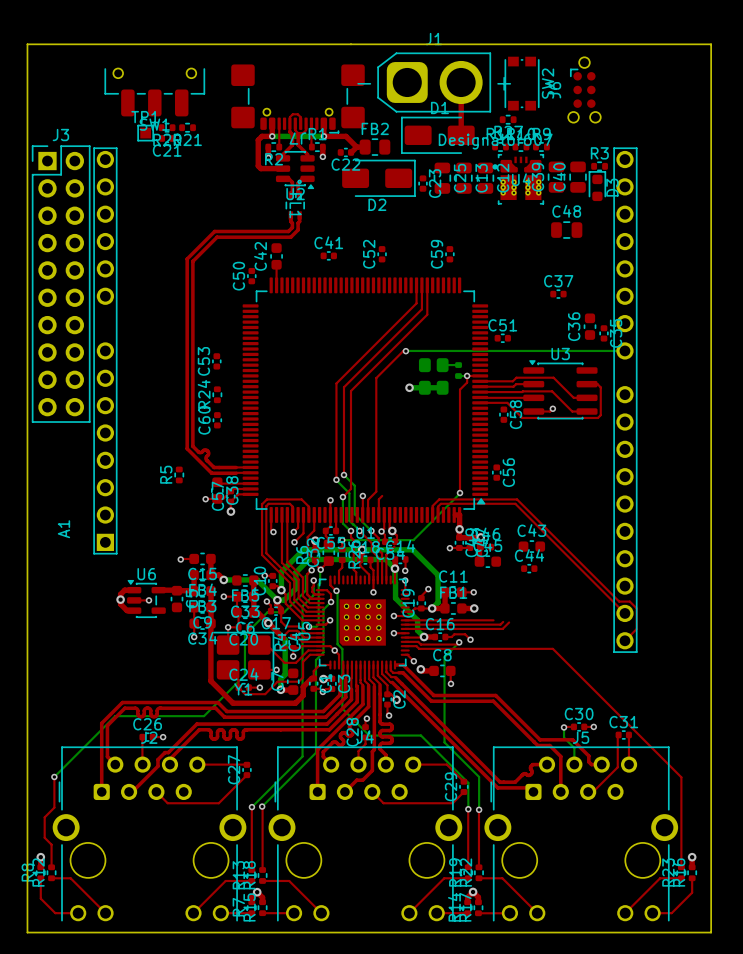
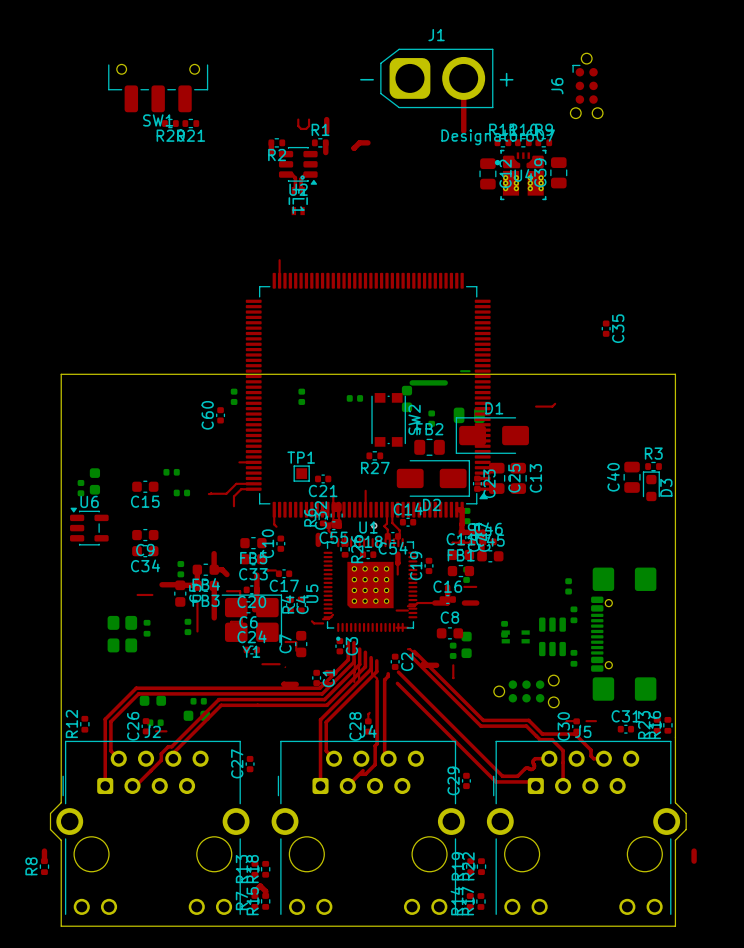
SW2 position: (522, 83) -> (388, 419)
J7: (298, 98) -> none
R27 position: (508, 119) -> (374, 455)
top track: (272, 123) (272, 136) (262, 136) (258, 140) (258, 165) (260, 168) (283, 168) -> none
top track: (279, 123) (279, 147) -> none
top track: (300, 123) (300, 117) (297, 114) (292, 114) (289, 117) (289, 131) -> none
top track: (311, 123) (311, 147) -> none
top track: (289, 131) (292, 134) (292, 145) (283, 154) (283, 158) -> none
TP1 position: (145, 133) -> (301, 473)
top track: (298, 133) (298, 145) (307, 154) (307, 158) -> none
D1 position: (437, 135) -> (492, 435)
bottom track: (272, 136) (323, 136) -> none
via: (272, 136) -> none
top track: (323, 136) (346, 136) (356, 147) -> none
via: (323, 136) -> none
C21 position: (167, 138) -> (323, 478)
FB2 position: (374, 147) -> (429, 447)
C22: (345, 152) -> none
via: (322, 156) -> none
via: (268, 157) -> none
R3 position: (599, 166) -> (653, 466)
C40 position: (578, 177) -> (632, 477)
D2 position: (378, 178) -> (433, 478)
C25 position: (442, 178) -> (496, 478)
C13 position: (463, 178) -> (518, 478)
C23 position: (422, 183) -> (477, 483)
D3 position: (597, 186) -> (651, 486)
top track: (290, 215) (292, 227) (288, 231) (214, 231) (187, 259) (187, 448) (211, 473) (250, 472) -> none
top track: (299, 215) (298, 229) (290, 237) (217, 237) (192, 261) (192, 446) (199, 452) (207, 450) (208, 453) (206, 459) (214, 467) (236, 467) -> none
C48 side: top (566, 230) -> bottom (469, 415)
C52 side: top (382, 254) -> bottom (301, 396)
C59 side: top (449, 254) -> bottom (234, 396)
C41 side: top (328, 255) -> bottom (354, 398)
C42 side: top (276, 256) -> bottom (406, 398)
C50 side: top (251, 276) -> bottom (431, 418)
J3: (61, 284) -> none
top track: (416, 285) (416, 303) (336, 383) (336, 479) -> none
top track: (421, 285) (421, 309) (343, 387) (343, 474) -> none
top track: (427, 285) (427, 314) (350, 391) (350, 488) (342, 497) -> none
C37: (558, 294) -> none
C36: (590, 326) -> none
C51: (502, 338) -> none
bottom track: (624, 350) (405, 351) -> none
top track: (405, 351) (403, 351) (376, 378) (376, 491) (368, 499) (368, 514) -> none
via: (405, 351) -> none
C53: (216, 361) -> none
bottom track: (442, 365) (458, 365) -> none
part: (458, 370) -> none
via: (467, 375) -> none
top track: (480, 375) (467, 375) (467, 382) (460, 389) (460, 493) -> none
part: (433, 376) -> none
top track: (480, 381) (512, 381) (516, 377) (553, 377) (573, 398) (587, 397) -> none
top track: (533, 384) (516, 384) (513, 386) (480, 386) -> none
top track: (587, 384) (597, 384) (600, 387) (600, 415) (597, 417) (522, 417) (507, 402) (480, 402) -> none
via: (409, 387) -> none
U3: (560, 389) -> none
top track: (480, 392) (552, 391) (572, 411) (587, 411) -> none
R24: (217, 394) -> none
top track: (480, 397) (533, 397) -> none
A1: (365, 400) -> none
via: (552, 408) -> none
C58: (503, 414) -> none
C56: (496, 472) -> none
R5: (179, 474) -> none
bottom track: (343, 474) (354, 485) (354, 514) (371, 530) -> none
via: (343, 474) -> none
part: none -> (171, 472)
bottom track: (336, 479) (349, 493) (349, 520) (359, 530) -> none
via: (336, 479) -> none
top track: (217, 482) (250, 483) -> none
part: none -> (94, 481)
C38: (217, 490) -> none
part: none -> (80, 488)
bottom track: (460, 493) (413, 540) (342, 540) -> none
via: (460, 493) -> none
via: (362, 495) -> none
top track: (382, 495) (378, 499) (378, 514) -> none
C57: (230, 496) -> none
bottom track: (342, 497) (342, 523) (350, 530) -> none
via: (342, 497) -> none
part: none -> (181, 492)
via: (205, 499) -> none
via: (330, 500) -> none
via: (230, 511) -> none
top track: (281, 514) (281, 562) (298, 579) (298, 597) (308, 607) (320, 607) -> none
top track: (287, 514) (287, 562) (302, 577) (302, 596) (309, 603) (320, 603) -> none
top track: (292, 514) (292, 506) (289, 503) (268, 503) (266, 506) (266, 553) (294, 581) (294, 599) (306, 611) (320, 611) -> none
top track: (298, 514) (298, 527) (293, 532) -> none
top track: (303, 514) (303, 533) (294, 542) -> none
top track: (308, 514) (308, 506) (301, 499) (266, 499) (262, 504) (262, 555) (290, 583) (290, 601) (304, 616) (320, 616) -> none
top track: (314, 514) (314, 530) (307, 537) (307, 552) (320, 569) (328, 560) -> none
top track: (432, 514) (432, 505) (439, 499) (517, 499) (619, 601) (629, 601) (636, 608) (636, 628) (624, 640) -> none
top track: (438, 514) (438, 506) (440, 503) (515, 503) (624, 613) -> none
part: none -> (467, 516)
via: (459, 529) -> none
top track: (350, 530) (350, 537) (353, 540) (353, 569) (356, 572) (356, 579) -> none
via: (350, 530) -> none
top track: (359, 530) (371, 543) (371, 550) (377, 556) (377, 579) -> none
via: (359, 530) -> none
top track: (371, 530) (378, 538) (378, 550) (382, 553) (382, 579) -> none
via: (392, 530) -> none
via: (381, 531) -> none
via: (273, 532) -> none
via: (293, 532) -> none
via: (480, 537) -> none
via: (315, 540) -> none
via: (342, 540) -> none
via: (294, 542) -> none
top track: (394, 546) (386, 554) (386, 579) -> none
C43: (531, 546) -> none
via: (449, 548) -> none
top track: (362, 549) (360, 565) (369, 574) (369, 579) -> none
via: (362, 549) -> none
C32 position: (328, 552) -> (336, 515)
R6 position: (315, 555) -> (323, 517)
top track: (194, 558) (180, 559) -> none
C15 position: (202, 558) -> (145, 486)
via: (180, 559) -> none
C14 position: (400, 559) -> (408, 522)
top track: (405, 559) (405, 570) -> none
top track: (342, 560) (339, 579) -> none
top track: (370, 560) (370, 567) (373, 570) (373, 592) -> none
via: (395, 568) -> none
C44: (529, 568) -> none
bottom track: (320, 569) (318, 624) (316, 626) (309, 626) -> none
via: (320, 569) -> none
top track: (311, 570) (307, 574) (307, 594) (311, 598) (320, 598) -> none
bottom track: (311, 570) (305, 576) (305, 590) (284, 612) (267, 612) (244, 634) (244, 675) (204, 716) (115, 716) (54, 776) -> none
via: (311, 570) -> none
via: (405, 570) -> none
part: none -> (180, 569)
via: (264, 575) -> none
bottom track: (223, 579) (257, 579) (277, 600) (284, 600) (295, 588) (295, 572) (308, 559) (385, 559) (395, 568) (395, 598) (417, 620) (417, 630) (424, 637) -> none
via: (223, 579) -> none
top track: (330, 579) (330, 585) (336, 590) -> none
FB5 position: (245, 580) -> (253, 543)
top track: (313, 580) (312, 591) (314, 594) (320, 594) -> none
bottom track: (313, 580) (313, 595) (302, 606) (302, 756) (251, 807) -> none
via: (313, 580) -> none
top track: (405, 580) (405, 590) -> none
via: (405, 580) -> none
part: none -> (466, 574)
C10 position: (272, 581) -> (280, 543)
top track: (272, 586) (277, 586) (285, 594) (285, 603) (302, 620) (320, 620) -> none
top track: (428, 589) (421, 598) -> none
via: (428, 589) -> none
top track: (134, 590) (124, 590) (120, 594) (120, 604) (127, 610) (134, 610) -> none
bottom track: (281, 590) (281, 571) (303, 549) (412, 549) (438, 575) (438, 602) (432, 608) -> none
via: (281, 590) -> none
top track: (320, 590) (326, 590) (331, 594) (331, 602) -> none
bottom track: (336, 590) (337, 644) (342, 649) (342, 708) (369, 735) (420, 735) (468, 782) (468, 809) -> none
via: (336, 590) -> none
part: none -> (568, 586)
via: (373, 592) -> none
C11 position: (453, 592) -> (460, 554)
via: (473, 592) -> none
via: (223, 596) -> none
C33 position: (245, 596) -> (253, 559)
U6 position: (146, 598) -> (89, 526)
via: (120, 599) -> none
via: (148, 600) -> none
top track: (277, 600) (277, 605) (281, 609) (281, 621) (285, 626) (299, 626) (305, 633) (320, 633) -> none
via: (277, 600) -> none
top track: (266, 601) (270, 605) (270, 611) -> none
via: (266, 601) -> none
bottom track: (331, 602) (323, 609) (323, 652) (315, 660) (316, 752) (262, 806) -> none
via: (331, 602) -> none
C19 position: (421, 603) -> (429, 565)
C9 position: (202, 607) -> (145, 535)
via: (432, 608) -> none
FB1 position: (453, 608) -> (460, 571)
via: (474, 608) -> none
C17 position: (276, 611) -> (284, 573)
top track: (253, 612) (258, 612) (282, 637) (288, 630) (299, 632) -> none
via: (393, 616) -> none
via: (330, 620) -> none
top track: (405, 620) (493, 620) -> none
part: none -> (573, 614)
top track: (503, 621) (500, 624) (405, 624) -> none
top track: (509, 622) (502, 628) (405, 628) -> none
C34 position: (202, 623) -> (145, 551)
top track: (210, 623) (210, 681) (233, 703) (295, 703) (303, 695) (303, 686) (313, 678) (313, 671) (319, 665) (330, 665) -> none
bottom track: (268, 623) (285, 639) (285, 674) (280, 679) (280, 689) -> none
via: (268, 623) -> none
via: (309, 626) -> none
U5 position: (362, 626) -> (370, 589)
via: (228, 627) -> none
C20 position: (243, 627) -> (251, 589)
top track: (248, 627) (248, 634) (259, 645) (266, 645) (284, 662) (295, 662) (308, 650) (320, 650) -> none
part: none -> (187, 626)
top track: (299, 632) (304, 637) (320, 637) -> none
part: none -> (147, 628)
via: (393, 633) -> none
part: none -> (504, 629)
top track: (293, 636) (297, 636) (302, 641) (320, 641) -> none
via: (194, 637) -> none
via: (424, 637) -> none
top track: (435, 637) (405, 637) -> none
C16 position: (440, 637) -> (447, 599)
top track: (445, 637) (465, 634) (470, 639) -> none
part: none -> (122, 634)
via: (470, 639) -> none
part: none -> (623, 634)
top track: (405, 641) (418, 641) (420, 644) (457, 644) (459, 642) -> none
C4 position: (282, 642) -> (290, 604)
R4 position: (293, 642) -> (301, 604)
bottom track: (459, 642) (444, 657) (444, 742) (479, 776) (479, 809) -> none
via: (459, 642) -> none
part: none -> (515, 636)
part: none -> (552, 636)
top track: (405, 646) (416, 646) (419, 648) (552, 648) (681, 777) (681, 867) -> none
top track: (293, 647) (330, 646) (339, 654) (339, 665) -> none
via: (334, 650) -> none
part: none -> (466, 644)
top track: (320, 654) (310, 654) (303, 661) (303, 677) (298, 681) (277, 681) (265, 694) (245, 694) (238, 687) (238, 680) (228, 669) -> none
via: (293, 656) -> none
part: none -> (453, 650)
Y1 position: (243, 657) -> (251, 619)
top track: none -> (365, 652) (365, 666) (326, 705) (257, 705)
via: (413, 661) -> none
part: none -> (573, 658)
top track: (343, 665) (343, 674) (340, 677) (340, 694) (323, 711) (226, 711) (217, 702) (122, 702) (101, 725) -> (348, 642) (348, 659) (319, 688) (136, 688) (105, 719)
top track: (347, 665) (345, 697) (325, 717) (224, 717) (215, 708) (159, 708) (154, 716) (151, 715) (150, 708) (146, 708) (143, 715) (140, 716) (136, 708) (124, 708) (107, 727) -> (353, 642) (353, 662) (322, 693) (138, 693) (110, 721)
top track: (360, 665) (362, 704) (317, 749) -> (371, 657) (371, 669) (320, 719) (320, 743)
top track: (364, 665) (364, 680) (368, 684) (368, 706) (349, 725) (352, 734) (348, 736) (343, 732) (340, 734) (343, 741) (342, 744) (333, 741) (323, 752) -> (376, 660) (376, 671) (326, 722) (326, 746)
top track: (373, 665) (373, 677) (380, 684) (380, 722) (392, 726) (390, 730) (381, 730) (380, 732) (381, 736) (390, 736) (392, 739) (390, 742) (380, 745) (380, 749) (385, 754) (385, 764) -> (388, 673) (384, 679) (384, 754) (388, 758)
top track: (377, 665) (377, 675) (387, 685) (387, 694) (391, 694) (396, 699) -> none
top track: (382, 665) (382, 673) (497, 787) -> (397, 683) (496, 781) (500, 781)
top track: (386, 665) (386, 672) (391, 677) (394, 677) -> none
top track: (390, 665) (390, 670) (393, 672) (398, 672) -> none
top track: (395, 665) (403, 665) (433, 695) (495, 695) (526, 726) -> (414, 651) (483, 720) (528, 720)
via: (276, 669) -> none
via: (420, 669) -> none
C8 position: (442, 670) -> (449, 633)
top track: none -> (285, 666) (285, 667)
top track: (398, 672) (403, 672) (431, 701) (493, 701) (524, 731) -> (410, 655) (480, 726) (526, 726)
via: (323, 679) -> none
C7 position: (293, 681) -> (301, 644)
C3 position: (332, 683) -> (339, 646)
via: (450, 683) -> none
top track: (356, 686) (357, 701) (329, 729) (245, 729) (240, 739) (237, 737) (234, 729) (231, 730) (230, 737) (227, 739) (224, 737) (223, 730) (218, 730) (217, 737) (213, 739) (211, 737) (209, 730) (199, 729) -> (257, 705) (221, 705) (202, 723)
C24 position: (243, 687) -> (251, 649)
top track: (248, 687) (259, 687) -> none
via: (259, 687) -> none
via: (280, 689) -> none
top track: (351, 689) (351, 699) (327, 724) (196, 724) -> (359, 649) (359, 664) (324, 699) (218, 699) (200, 718)
via: (322, 691) -> none
part: none -> (526, 691)
C2 position: (387, 699) -> (395, 661)
via: (396, 699) -> none
top track: (387, 704) (389, 715) -> none
part: none -> (152, 700)
part: none -> (198, 701)
via: (389, 715) -> none
via: (366, 718) -> none
part: none -> (196, 715)
C30 rotation: 0° (579, 726) -> 90° clockwise (576, 726)
via: (593, 726) -> none
bottom track: (564, 727) (564, 737) (574, 748) (574, 764) -> none
via: (564, 727) -> none
part: none -> (155, 722)
top track: (618, 734) (617, 767) (593, 791) (588, 791) -> none
top track: (628, 734) (628, 764) -> none
top track: (142, 737) (142, 764) -> none
C26 rotation: 0° (147, 737) -> 90° clockwise (146, 726)
via: (163, 737) -> none
top track: (365, 737) (365, 744) (358, 751) (358, 764) -> none
top track: (197, 764) (246, 764) -> none
top track: (413, 764) (446, 764) (463, 781) -> none
top track: (246, 775) (218, 803) (167, 803) (156, 791) -> none
top track: (54, 776) (54, 807) (44, 817) (44, 837) (51, 844) (51, 867) -> none
via: (54, 776) -> none
top track: (372, 791) (383, 803) (452, 803) (463, 792) -> none
top track: (262, 806) (262, 869) -> none
via: (262, 806) -> none
top track: (251, 807) (251, 869) -> none
via: (251, 807) -> none
top track: (468, 809) (468, 867) -> none
via: (468, 809) -> none
top track: (478, 809) (478, 867) -> none
via: (479, 809) -> none
via: (40, 857) -> none
via: (692, 857) -> none
R12 position: (51, 872) -> (84, 724)
R23 position: (681, 872) -> (657, 725)
R16 position: (692, 872) -> (667, 725)
top track: (40, 878) (40, 898) (55, 913) (78, 913) -> none
top track: (51, 878) (70, 878) (105, 913) -> none
top track: (468, 878) (444, 878) (409, 913) -> none
top track: (478, 878) (502, 878) (537, 913) -> none
top track: (681, 878) (660, 878) (625, 913) -> none
top track: (692, 878) (692, 892) (671, 913) (652, 913) -> none
top track: (251, 880) (225, 880) (193, 913) -> none
top track: (262, 880) (289, 880) (321, 913) -> none
via: (473, 891) -> none
via: (257, 892) -> none
top track: (467, 901) (467, 897) (473, 891) (478, 897) (478, 901) -> none
top track: (220, 913) (251, 913) -> none
top track: (262, 913) (294, 913) -> none
top track: (436, 913) (467, 913) -> none
top track: (478, 913) (509, 913) -> none
board edge: (57, 932) (27, 932) (27, 44) (711, 44) (711, 932) (673, 932) -> (61, 926) (61, 840) (50, 829) (50, 813) (61, 802) (61, 374) (675, 374) (675, 802) (686, 813) (686, 829) (675, 840) (675, 926)

